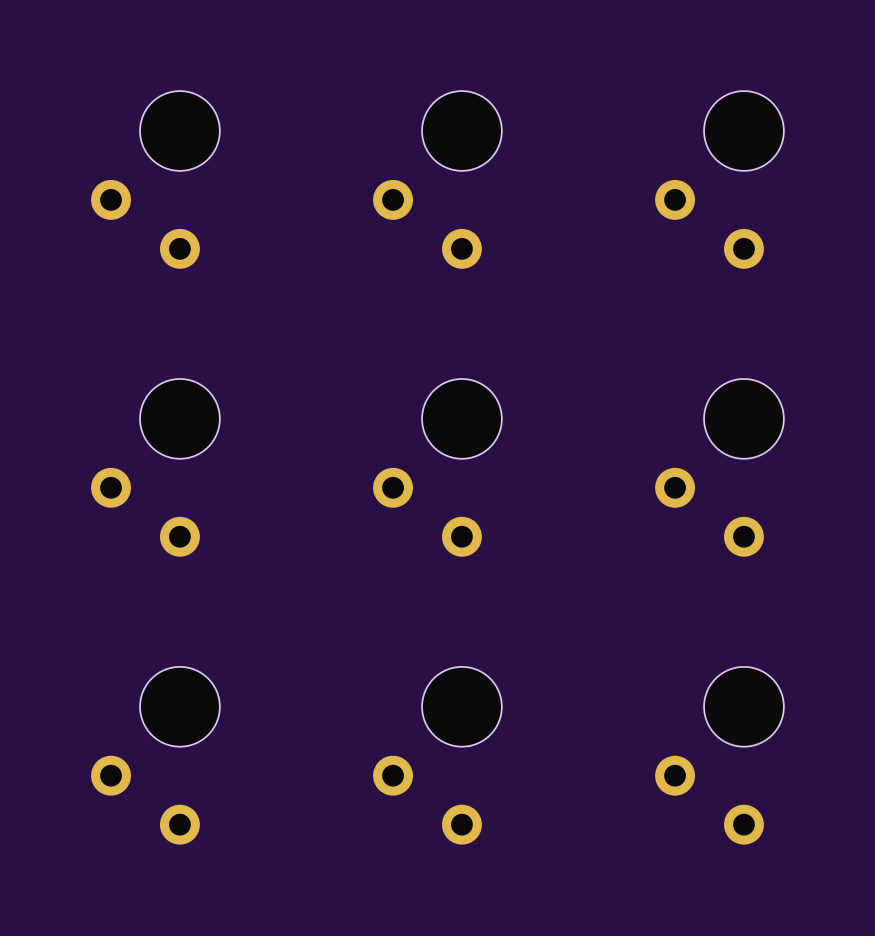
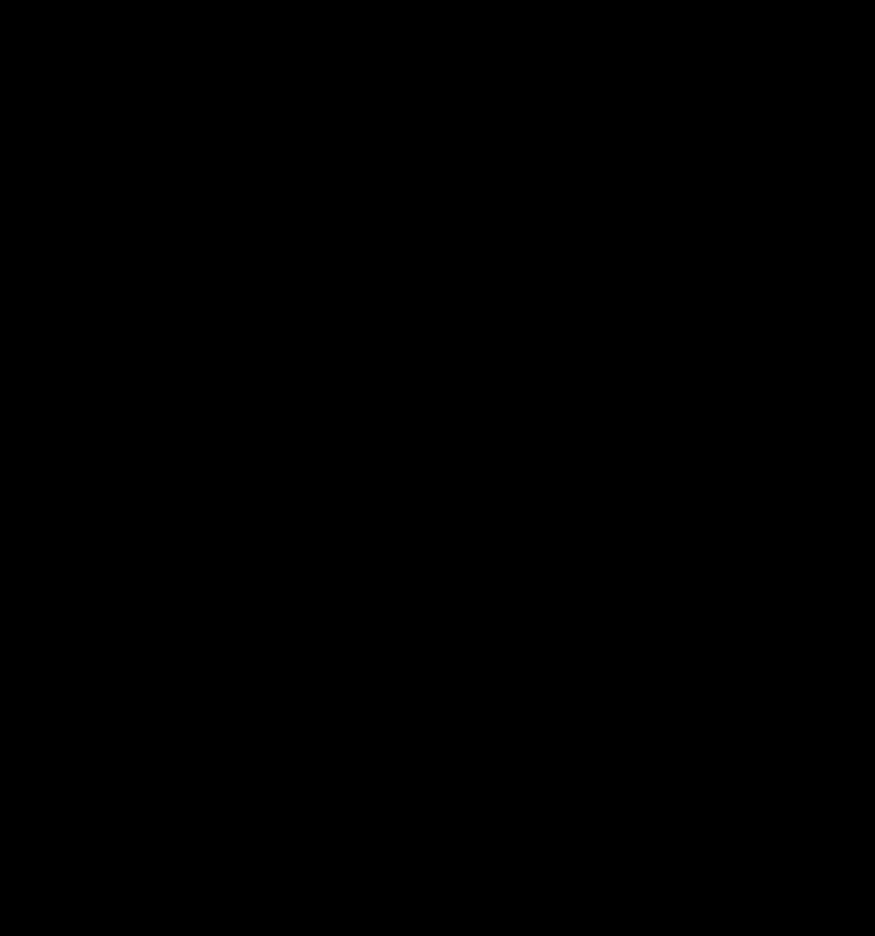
part: (155, 179) -> none
part: (437, 179) -> none
part: (719, 179) -> none
part: (155, 467) -> none
part: (437, 467) -> none
part: (719, 467) -> none
part: (155, 755) -> none
part: (437, 755) -> none
part: (719, 755) -> none

